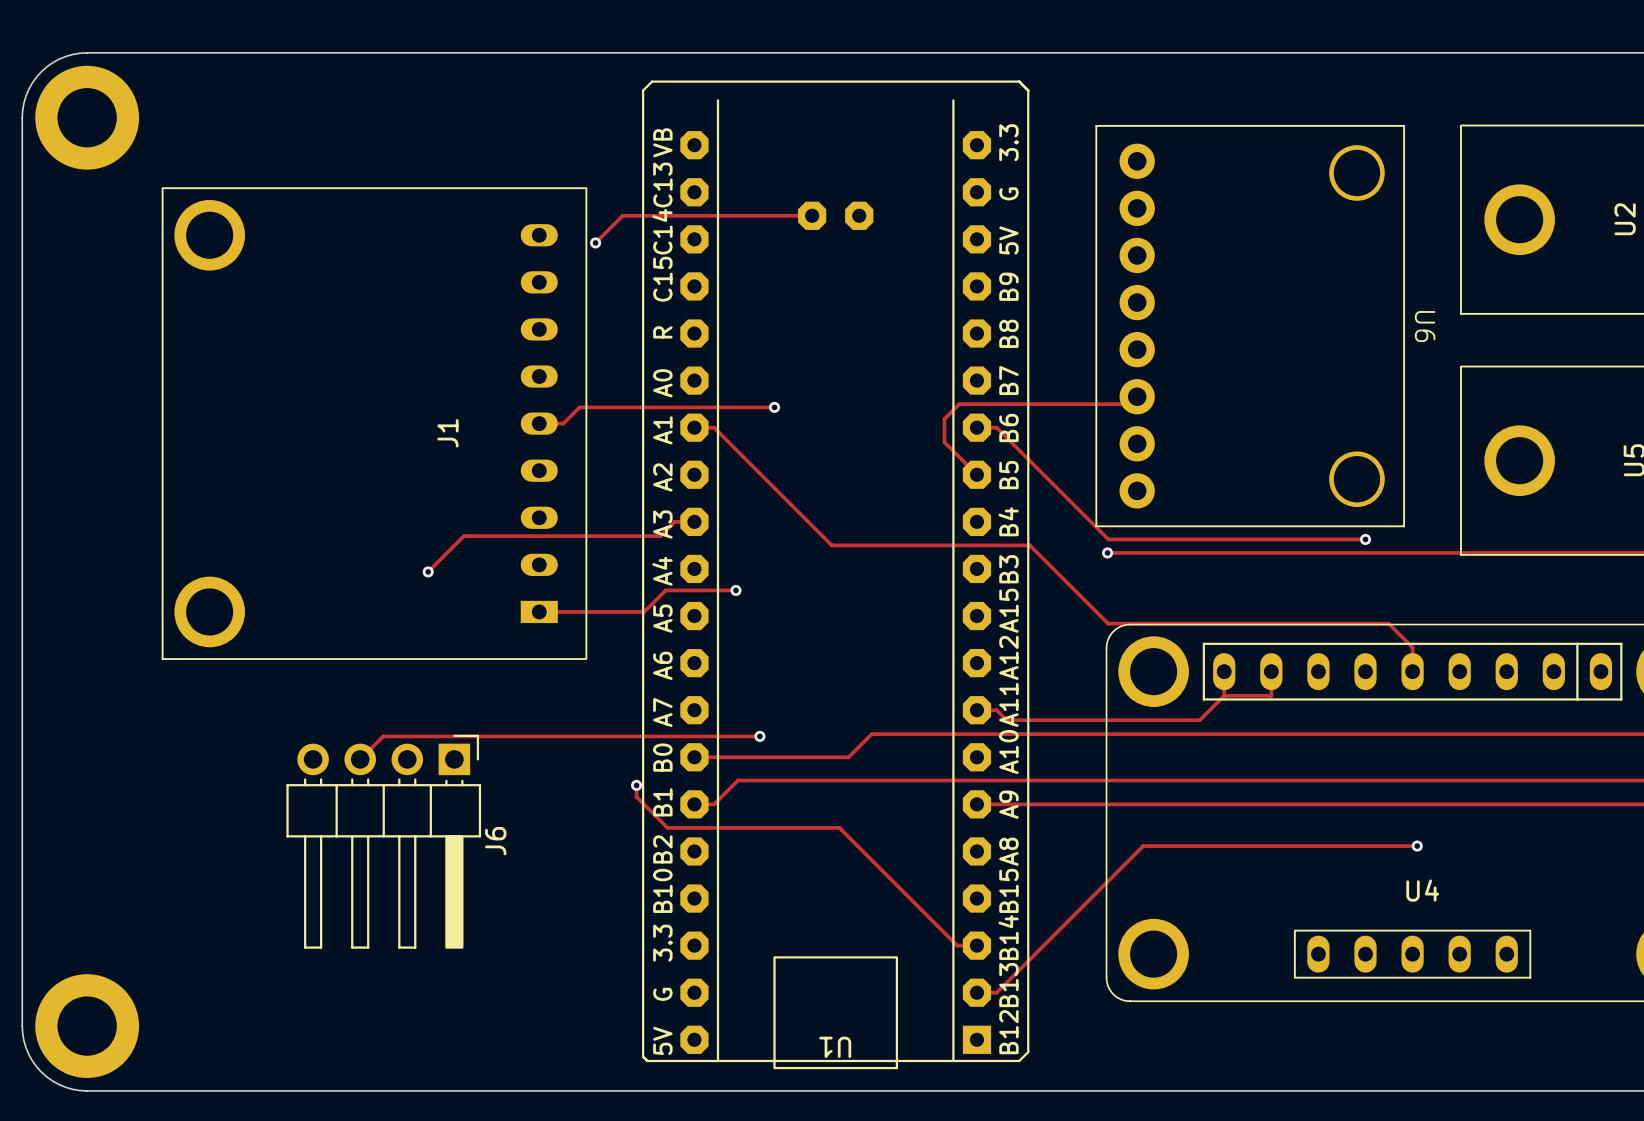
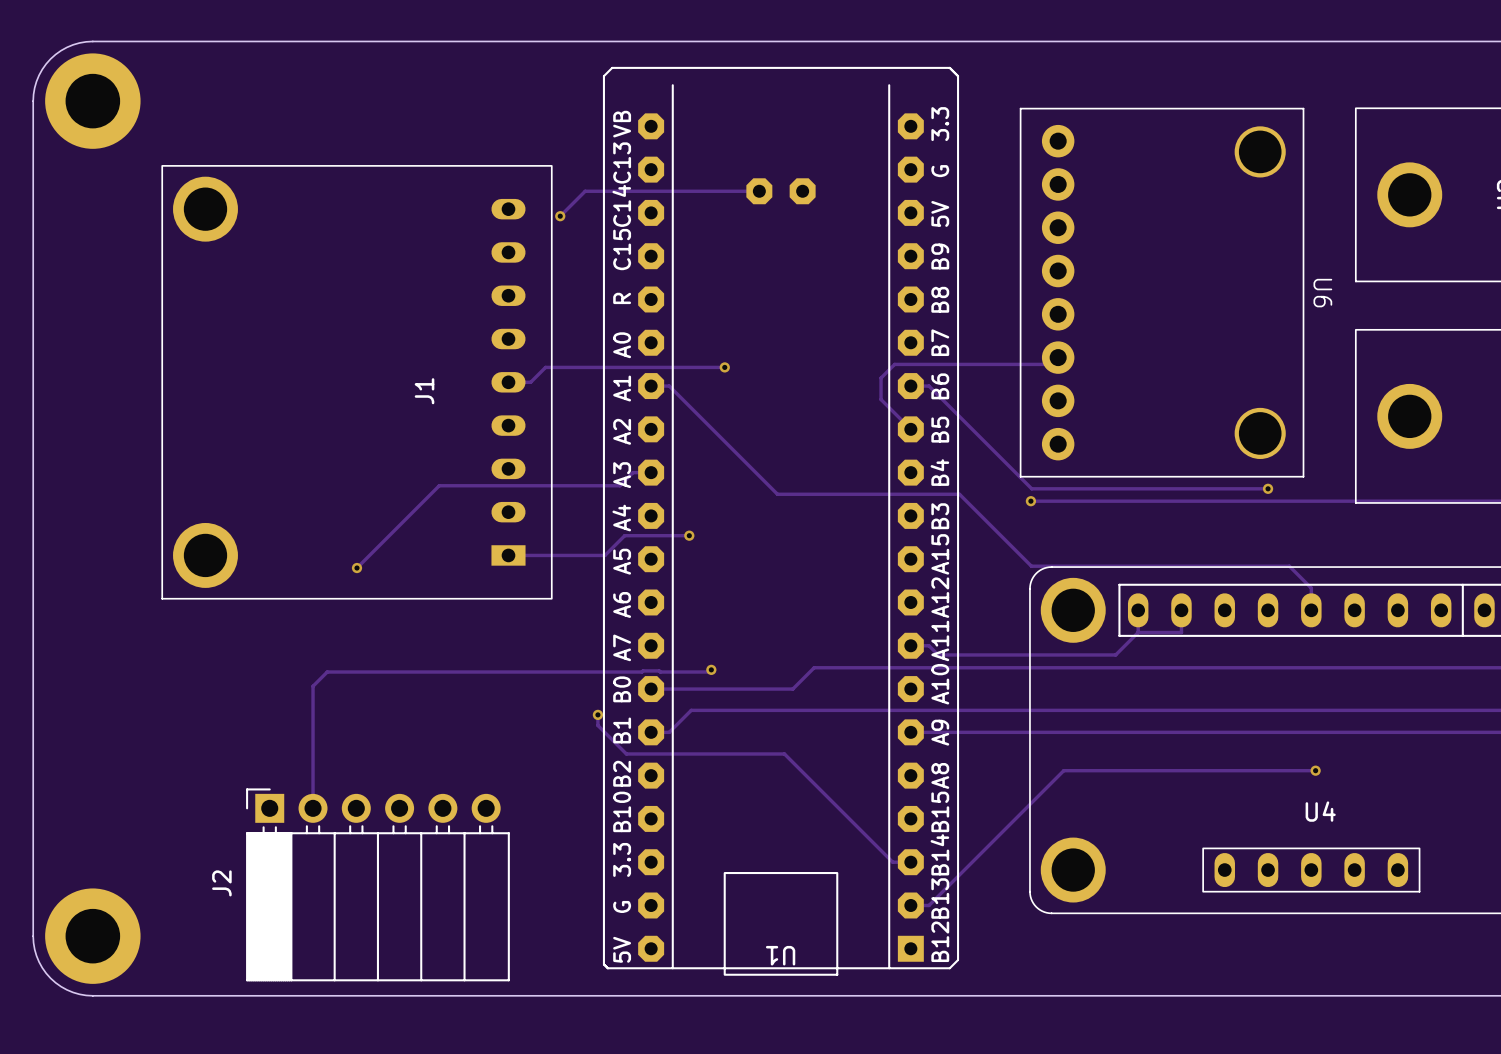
track: none -> (406, 518) (356, 568)
via position: (428, 571) -> (356, 568)
track: (759, 736) (383, 736) (360, 759) -> (711, 669) (709, 672) (327, 672) (313, 686) (313, 808) (315, 816)
J6: (383, 841) -> none
J2: none -> (377, 884)

